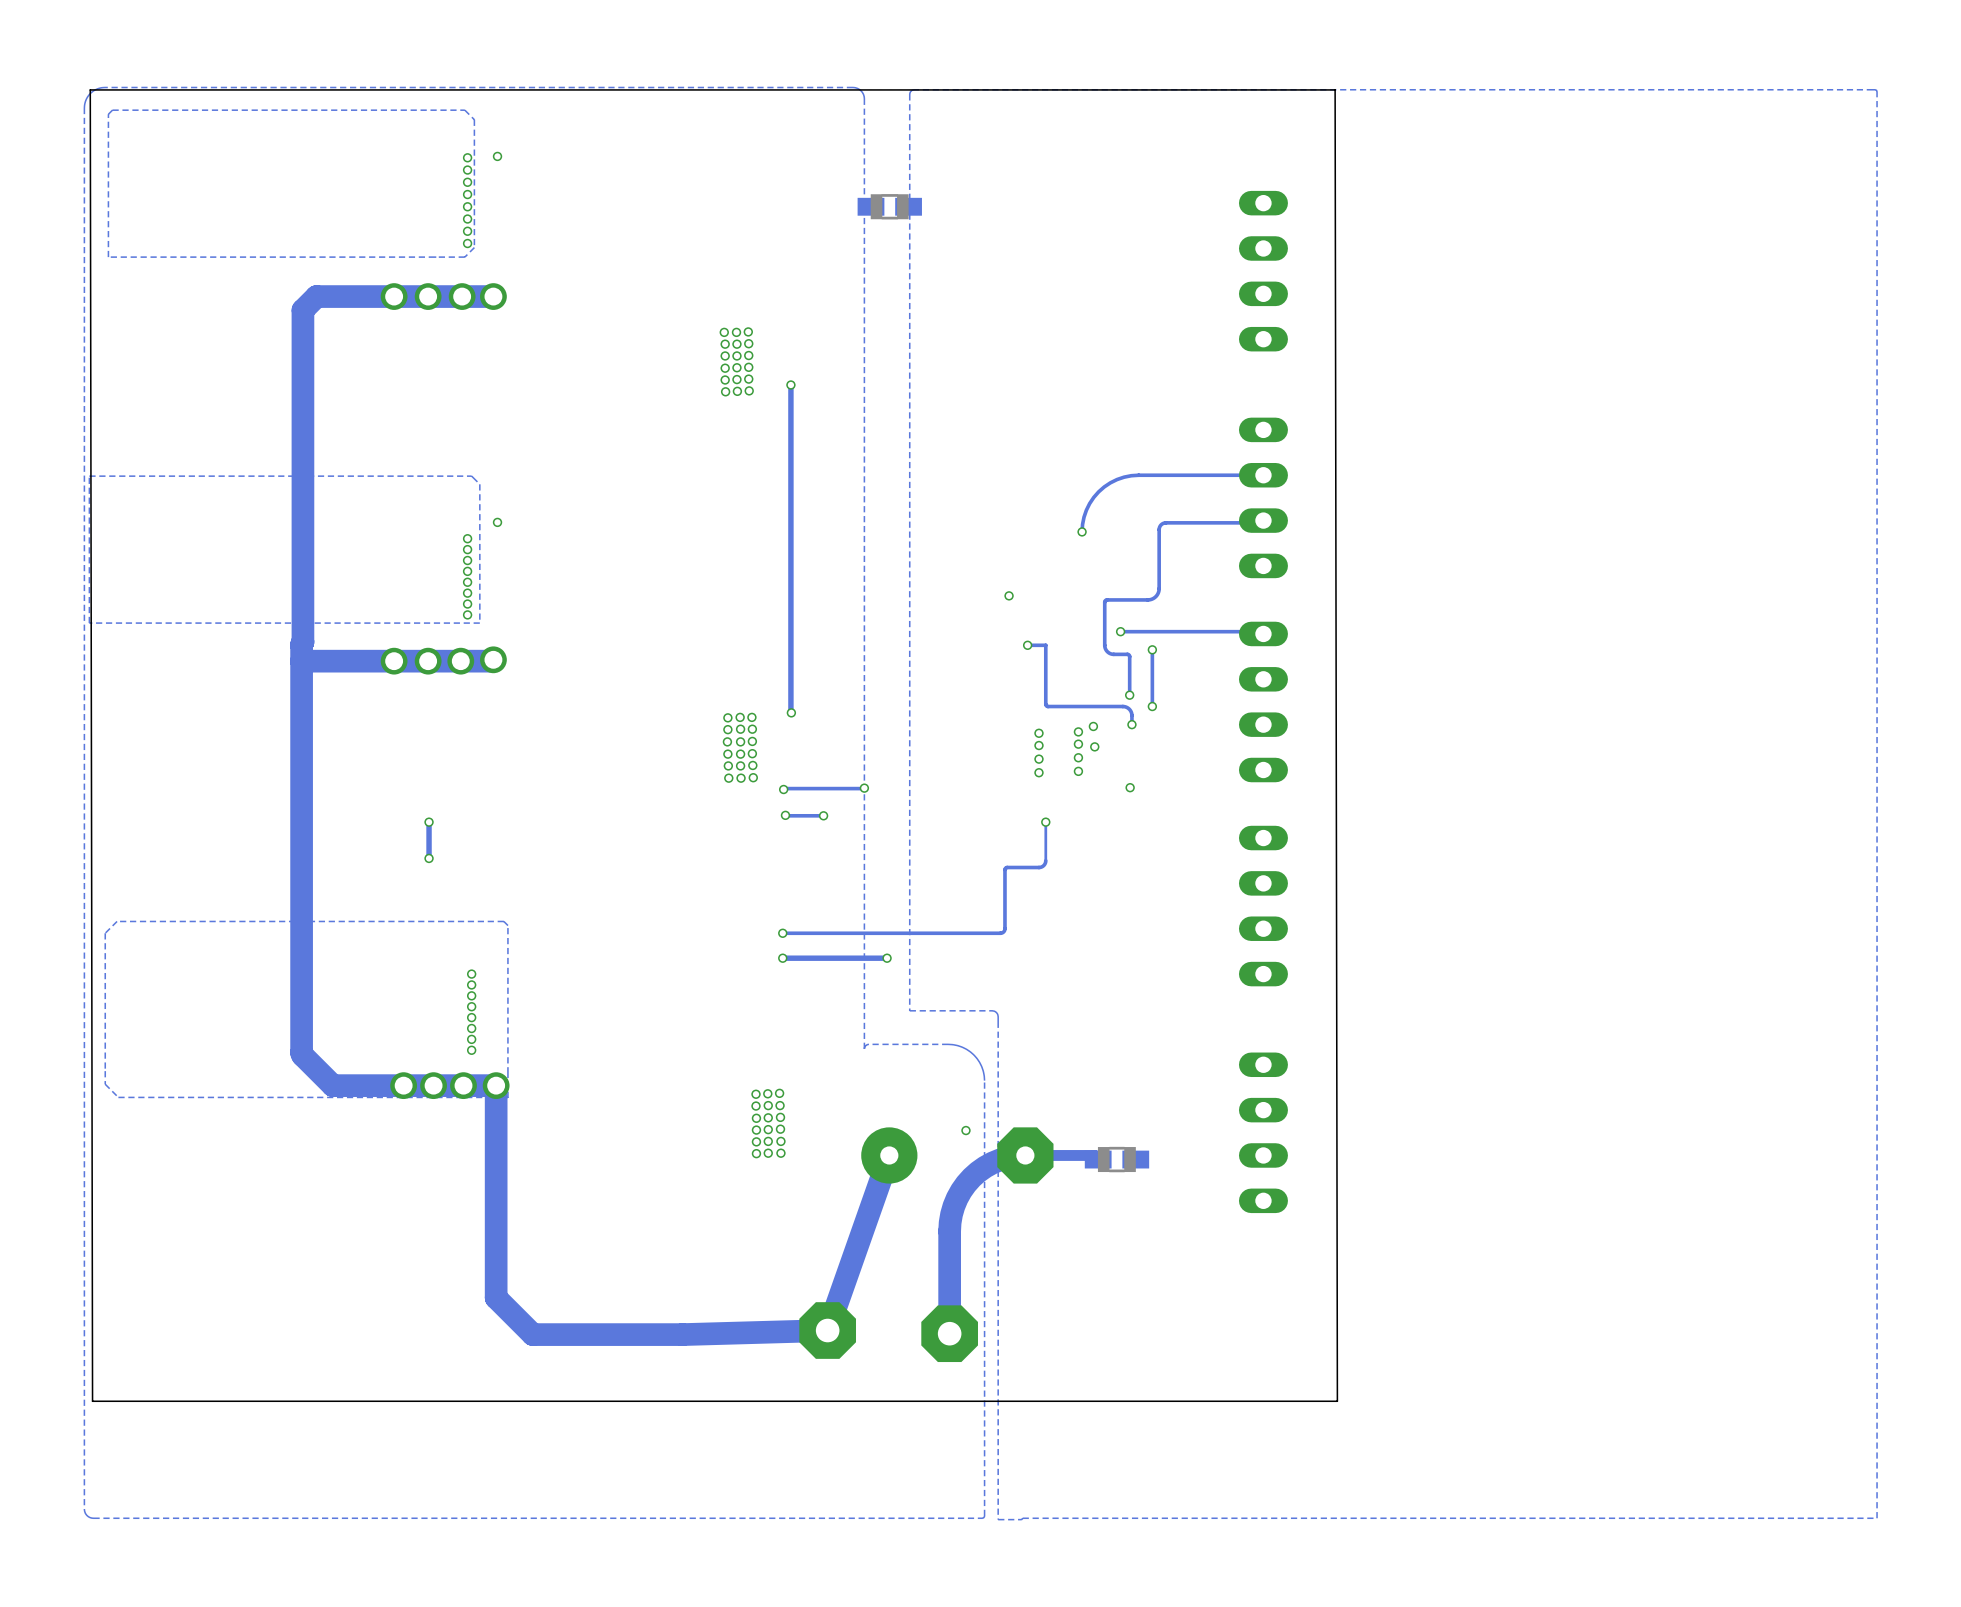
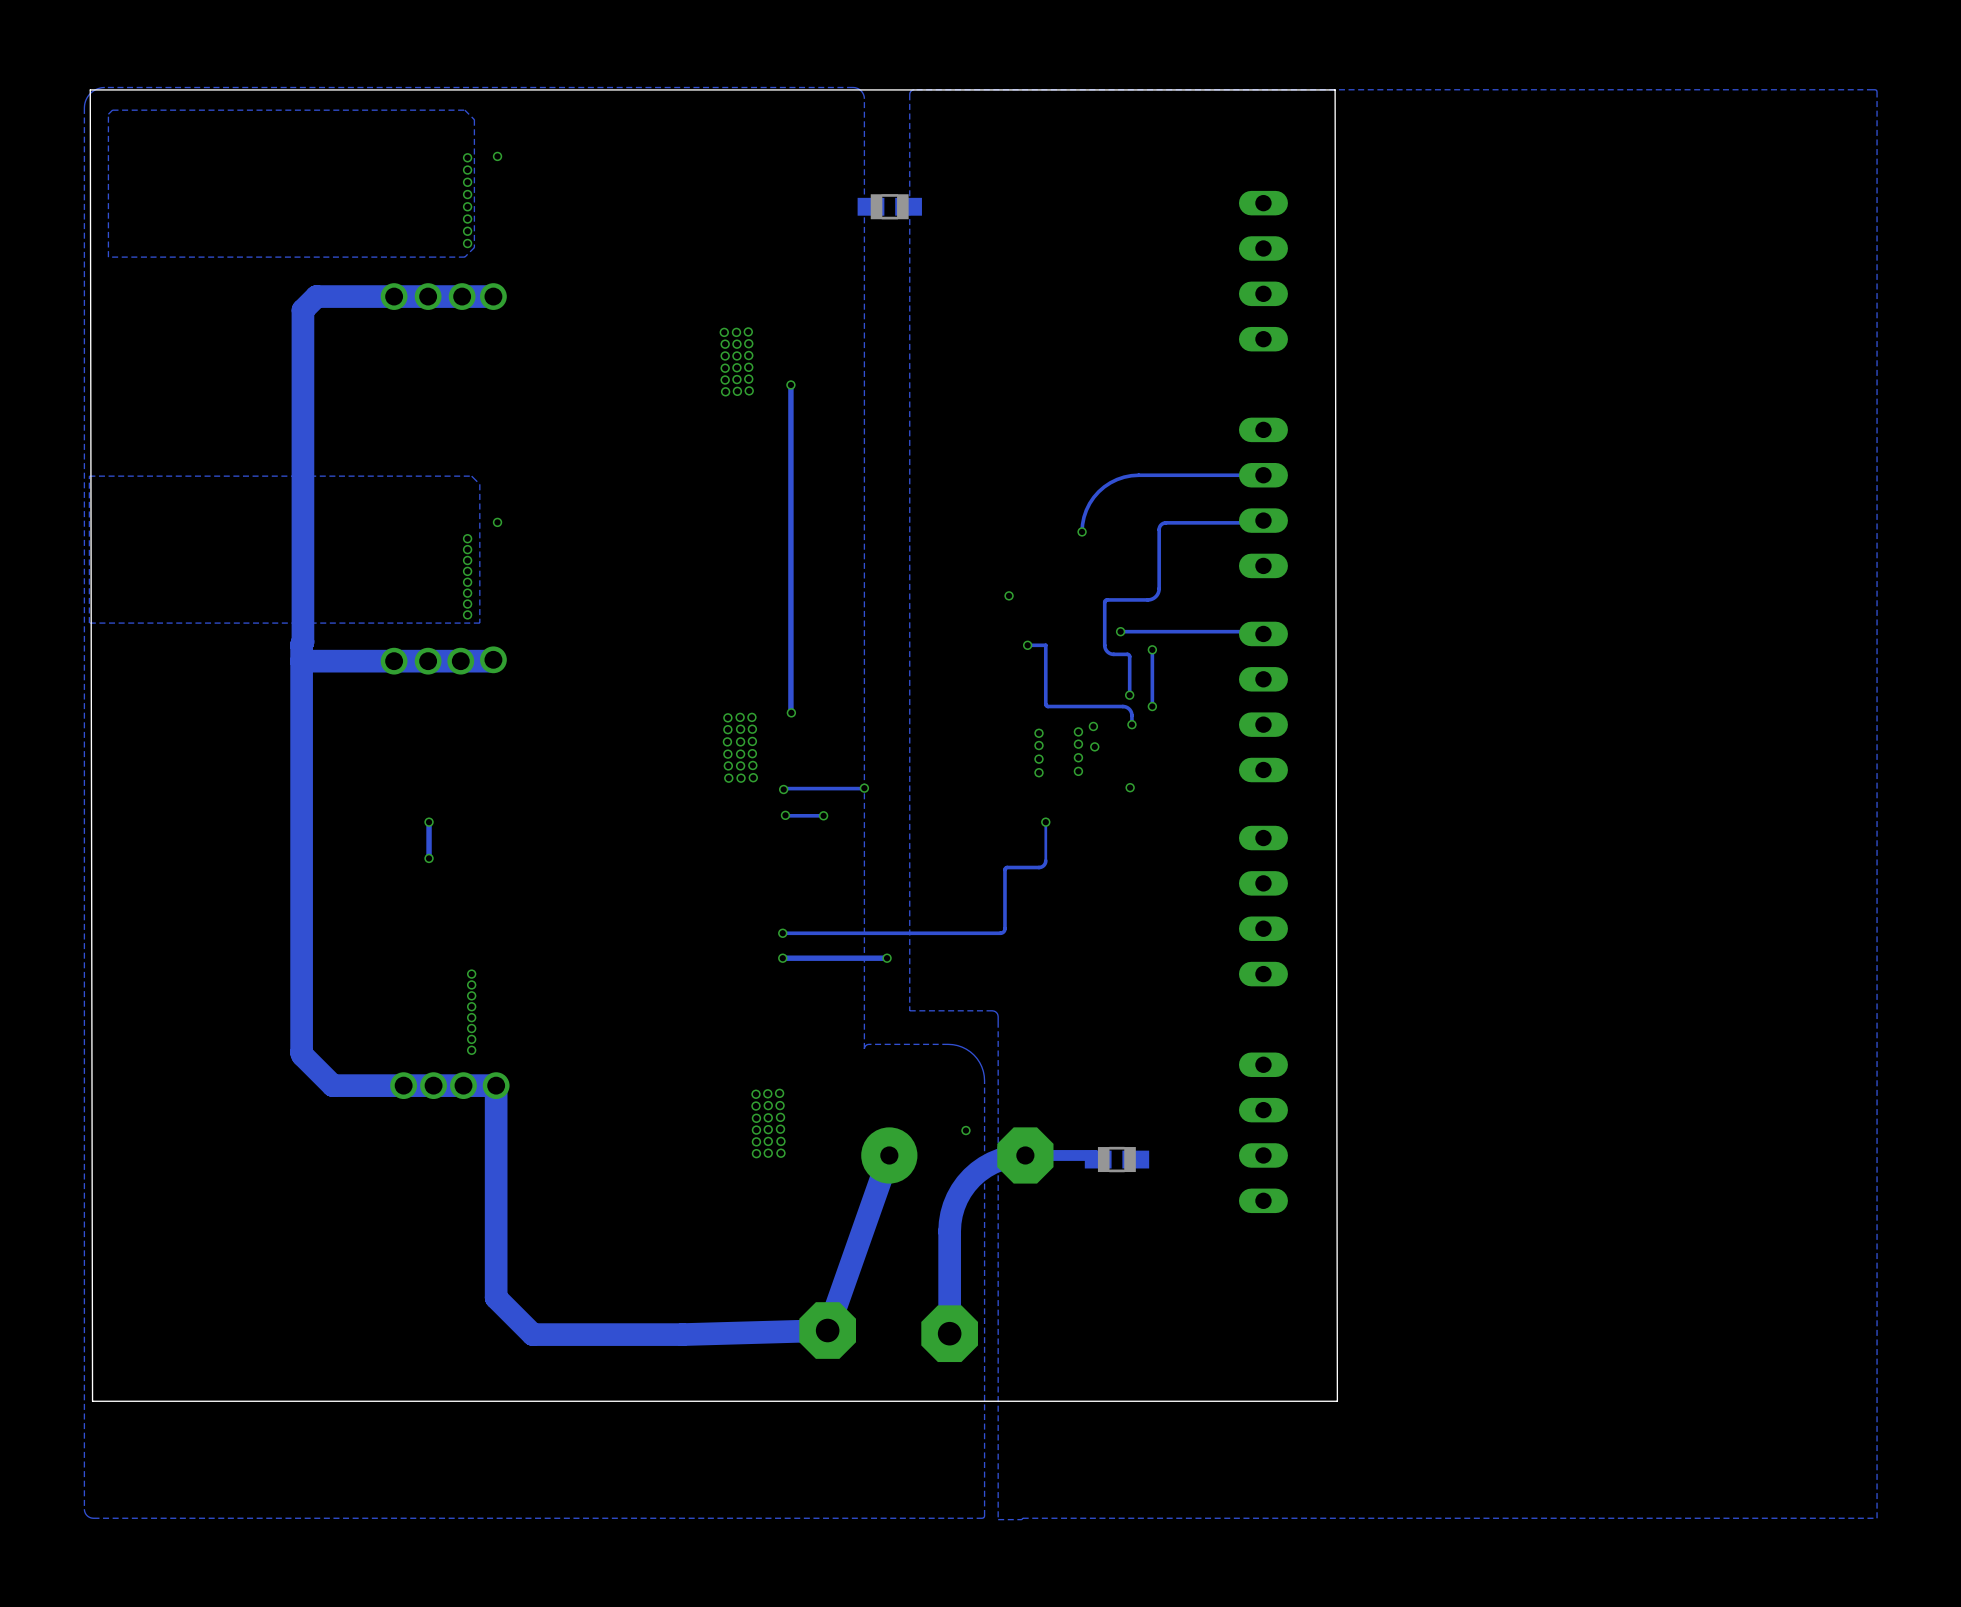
zone outline: (503, 921) (507, 925) (507, 1097) (118, 1097) (105, 1084) (105, 933) (117, 921) (503, 921) -> none

